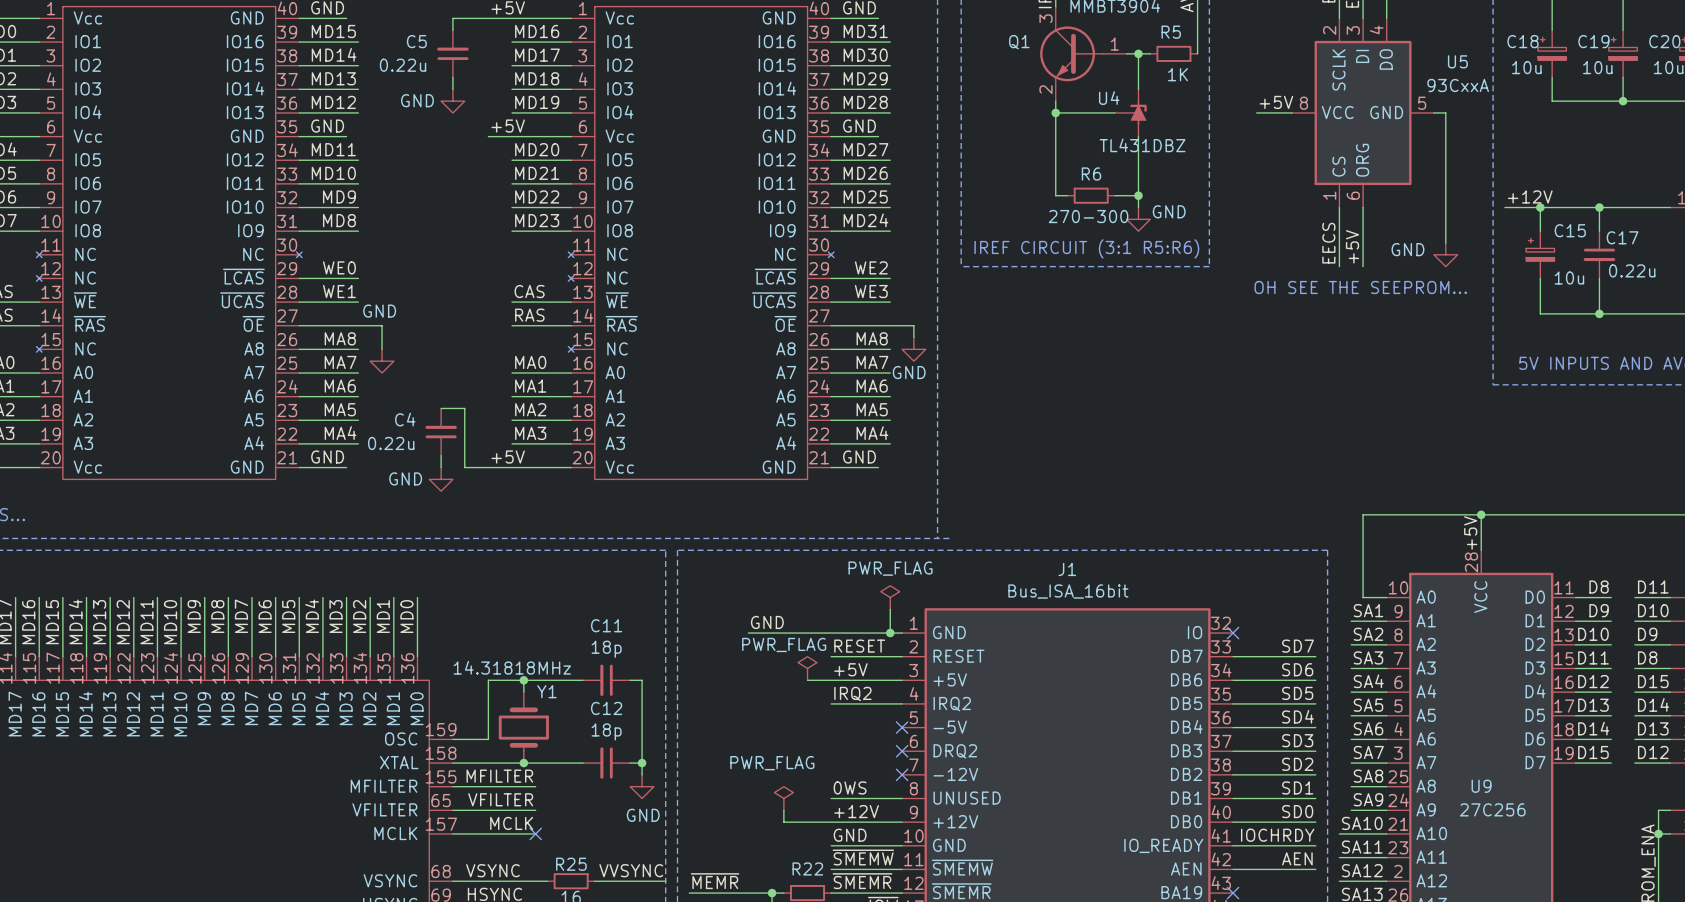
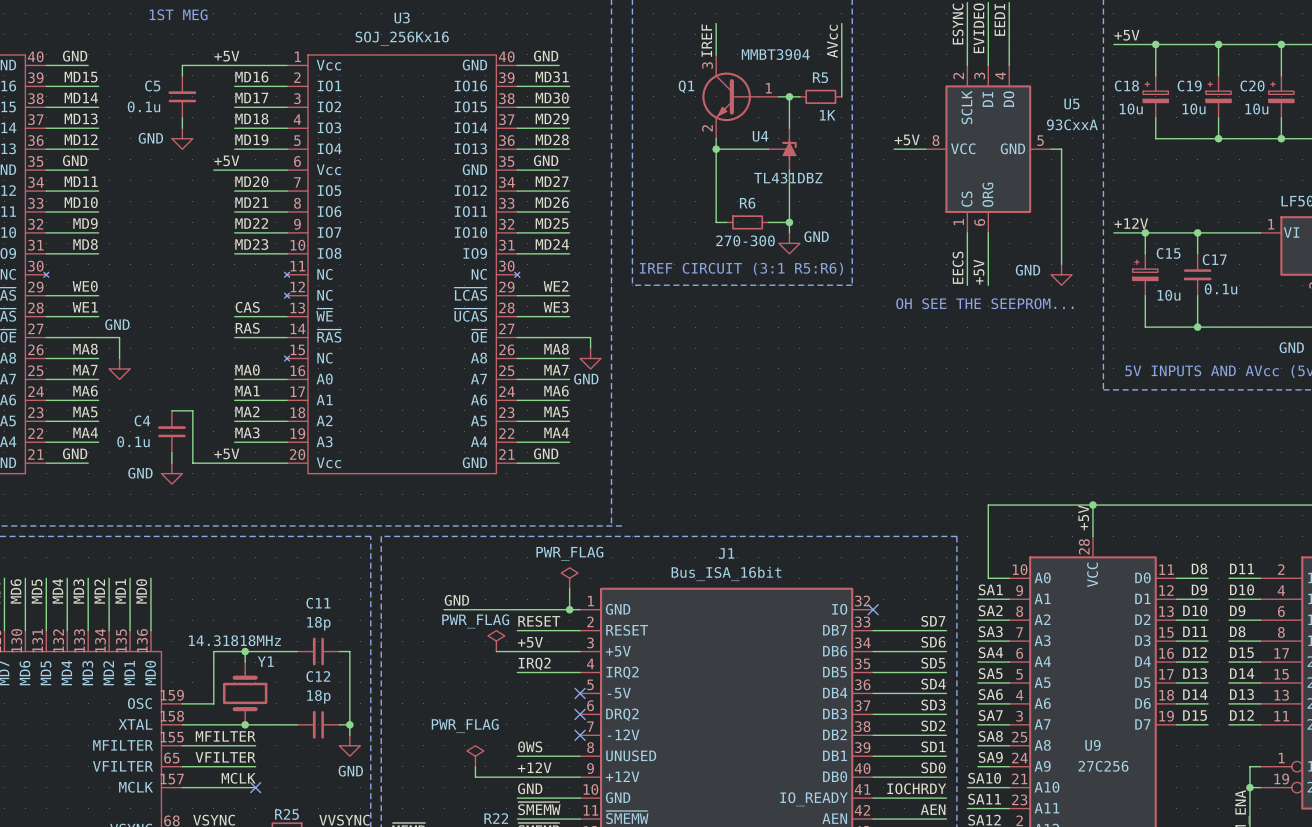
C5 value: 0.22u (403, 65) -> 0.1u (143, 106)
C17 value: 0.22u (1632, 270) -> 0.1u (1221, 289)
C4 value: 0.22u (391, 443) -> 0.1u (133, 441)

